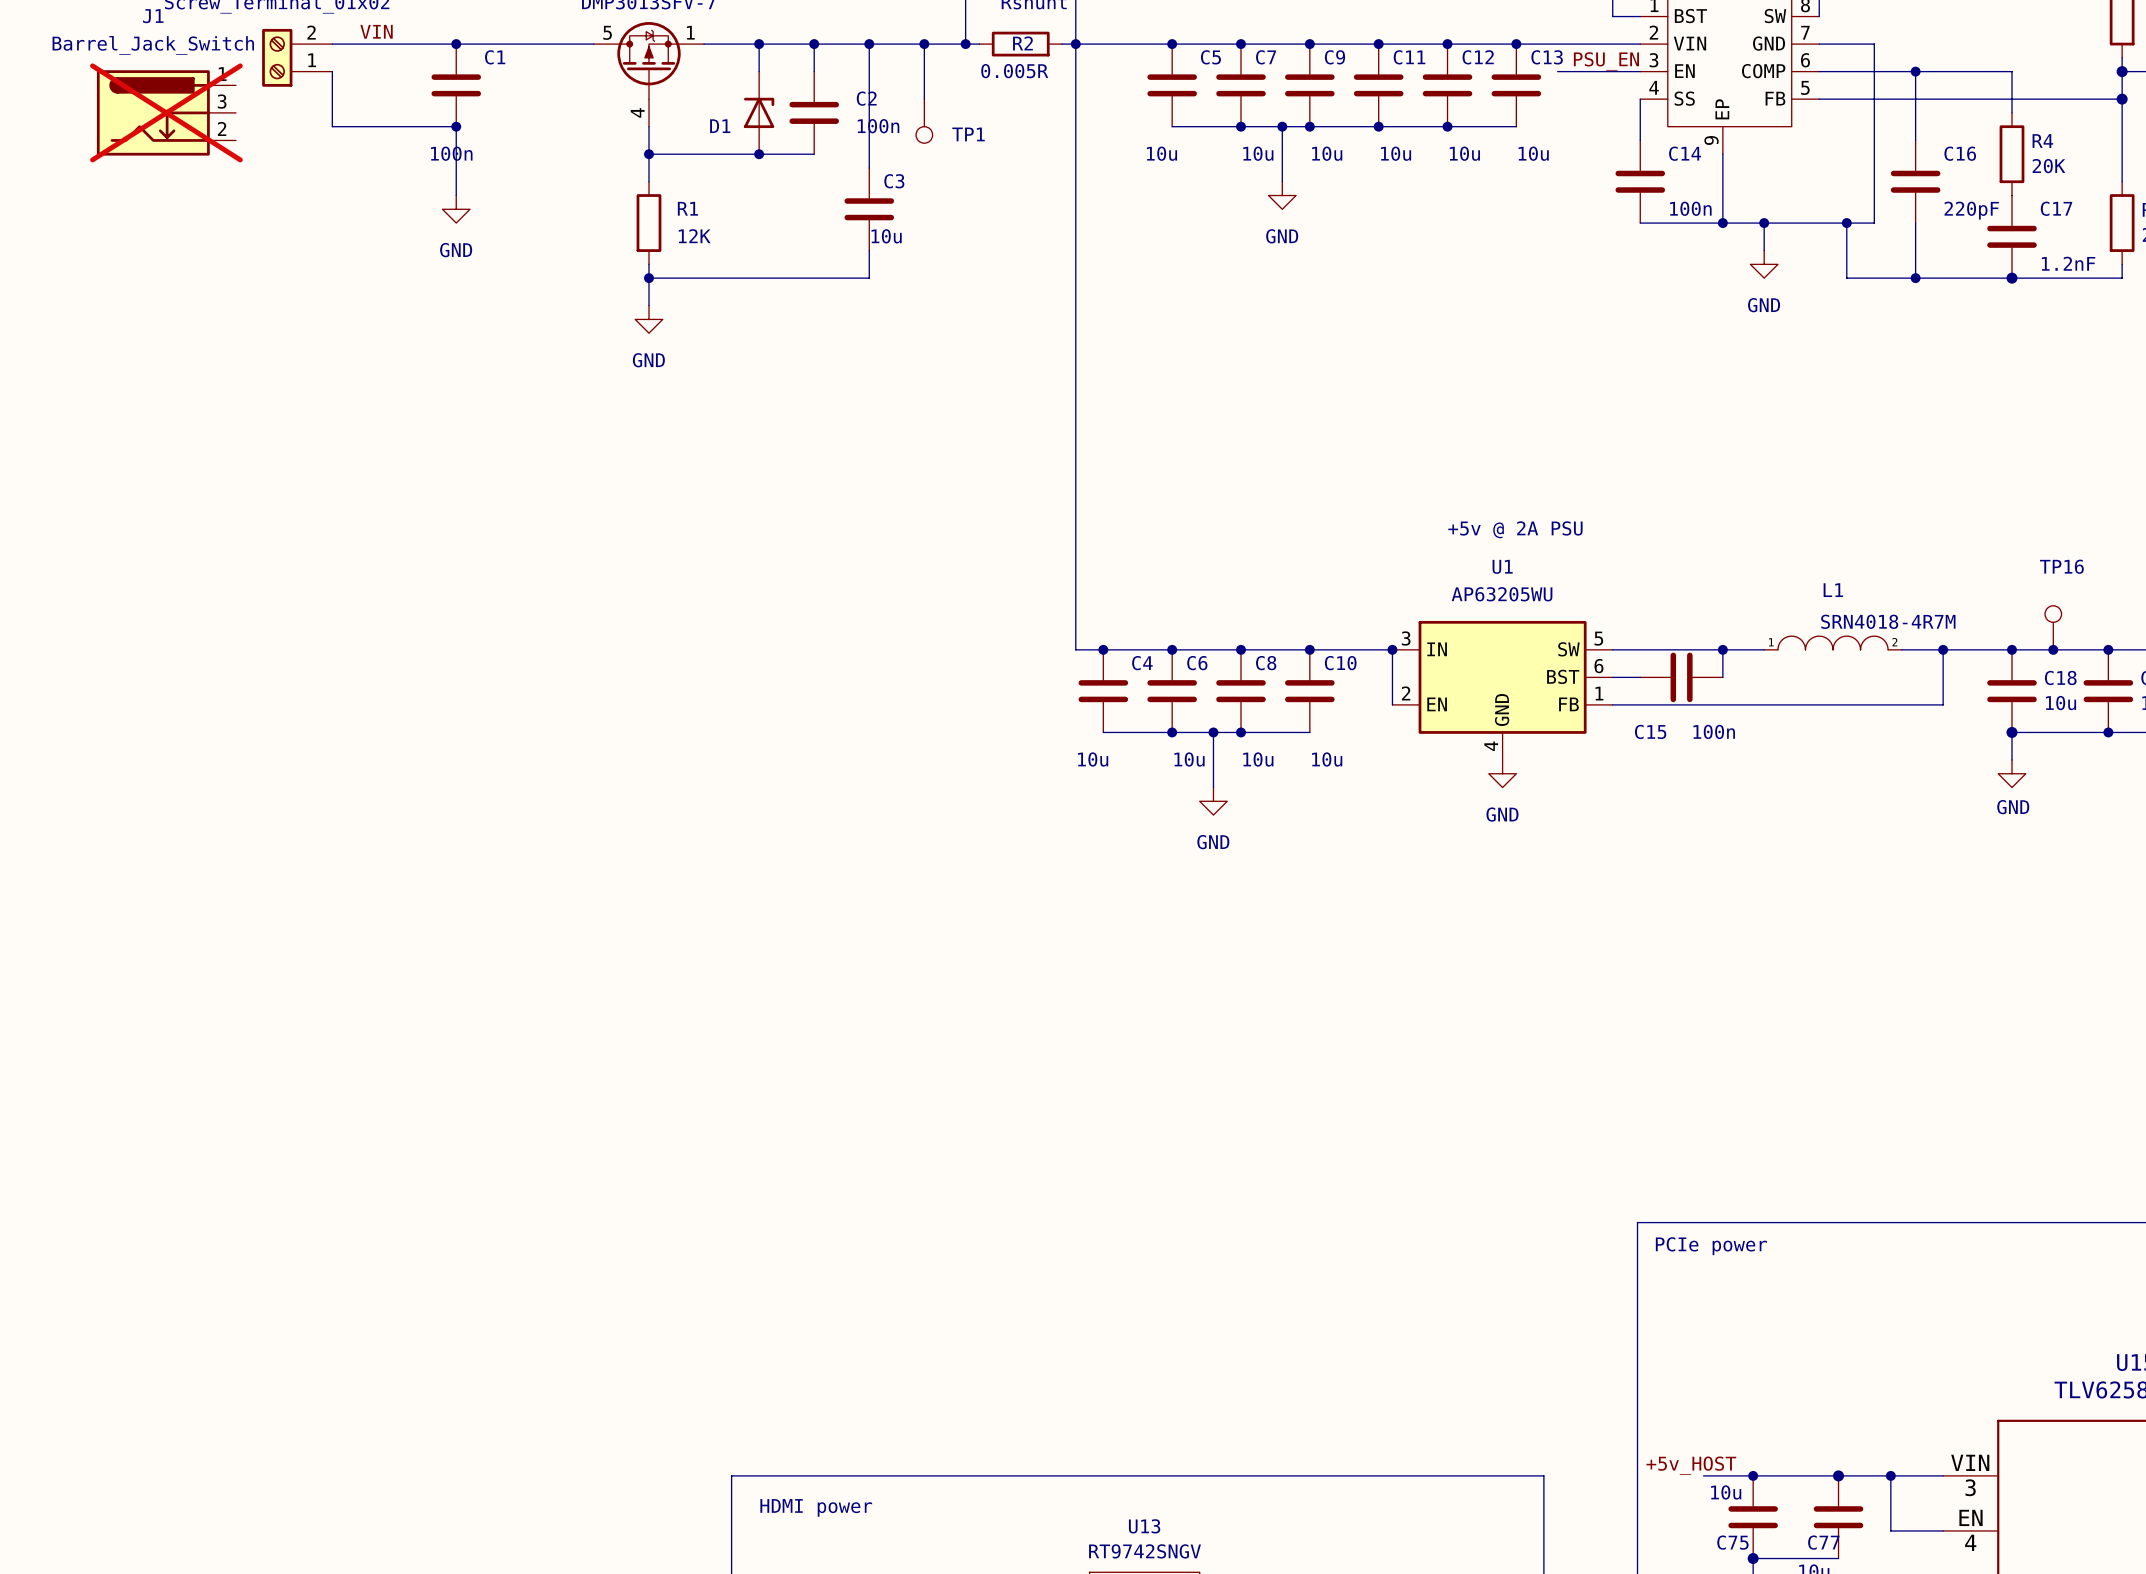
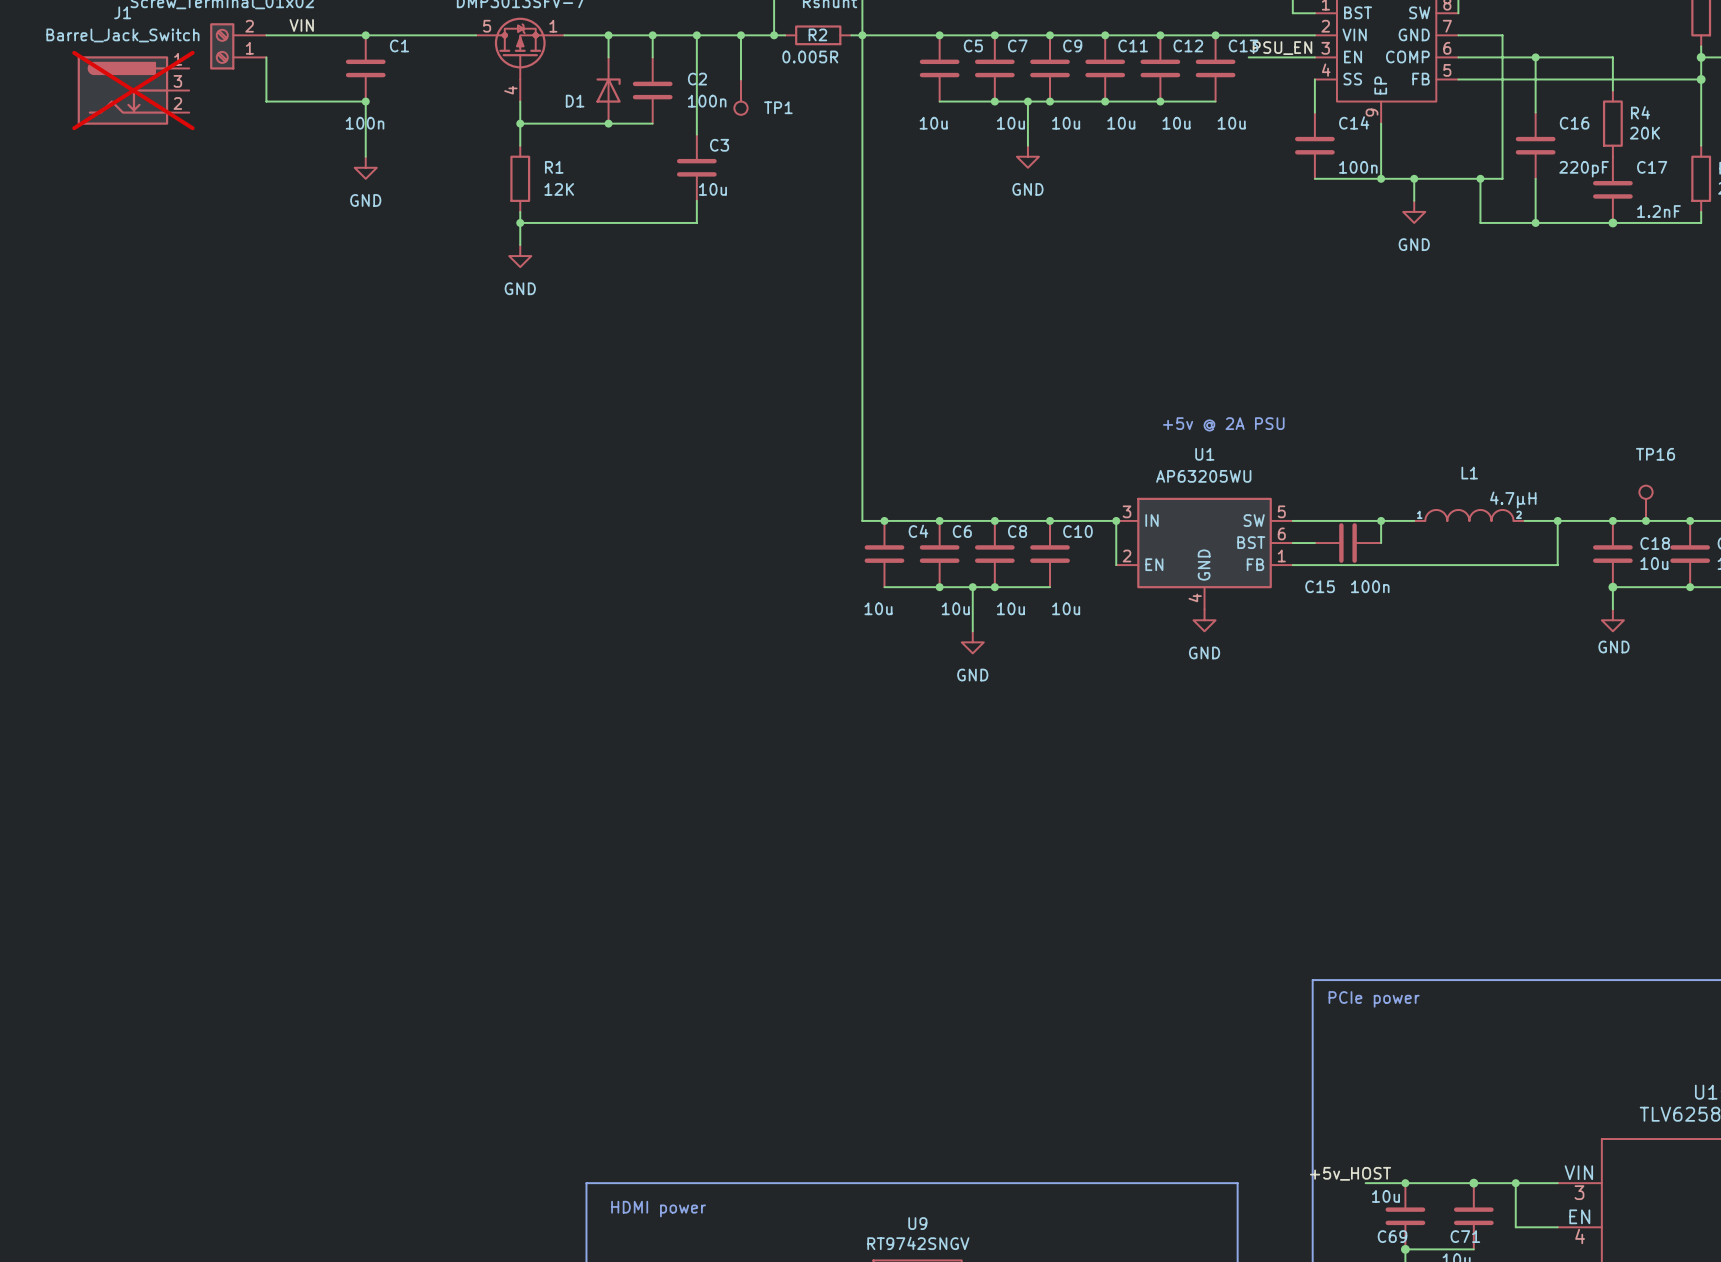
L1 value: SRN4018-4R7M (1888, 621) -> 4.7µH (1513, 500)
U13 name: U13 (1144, 1526) -> U9 (917, 1223)
C75 name: C75 (1732, 1542) -> C69 (1392, 1236)
C77 name: C77 (1823, 1542) -> C71 (1465, 1236)

